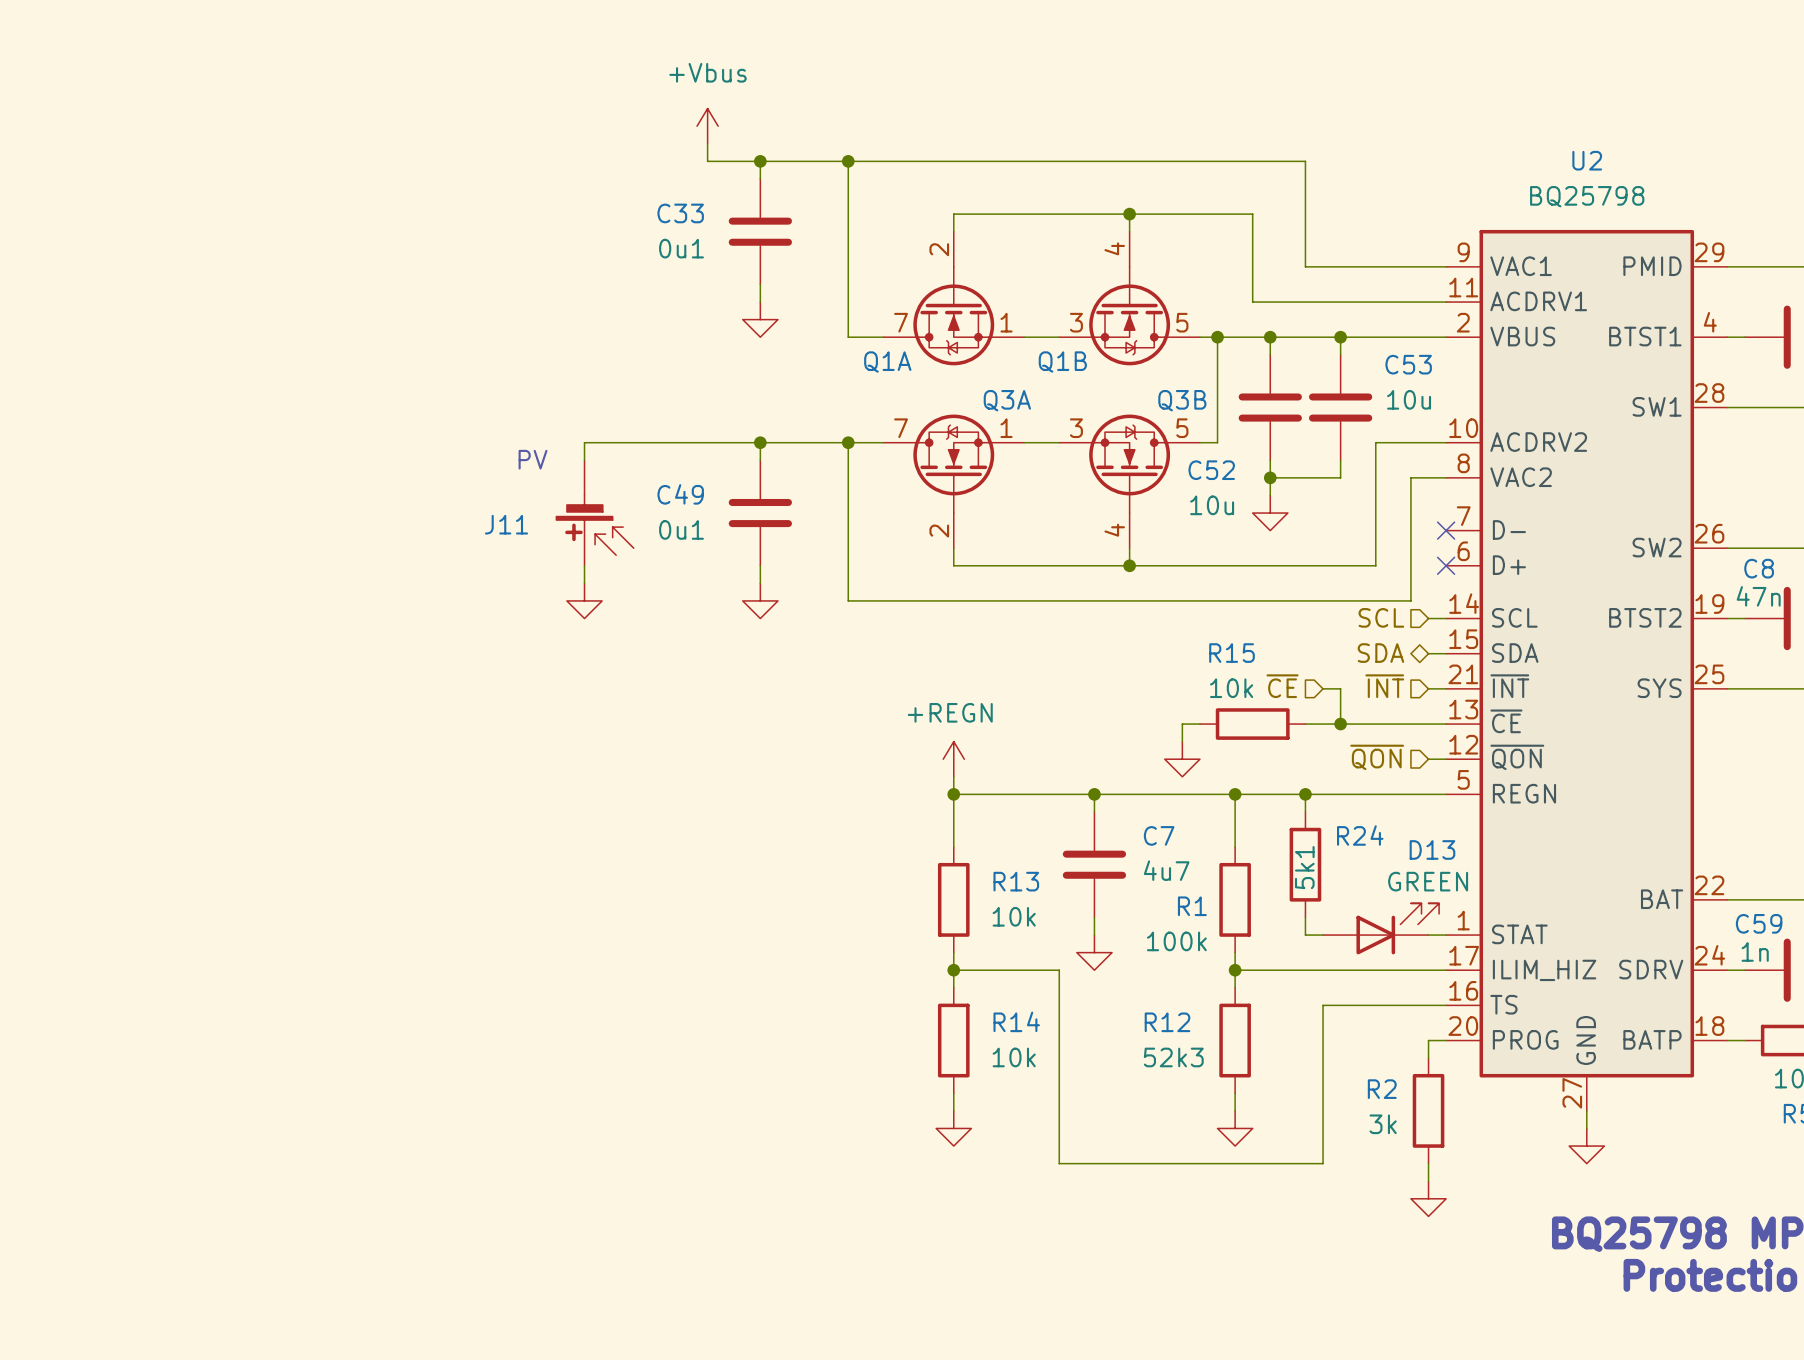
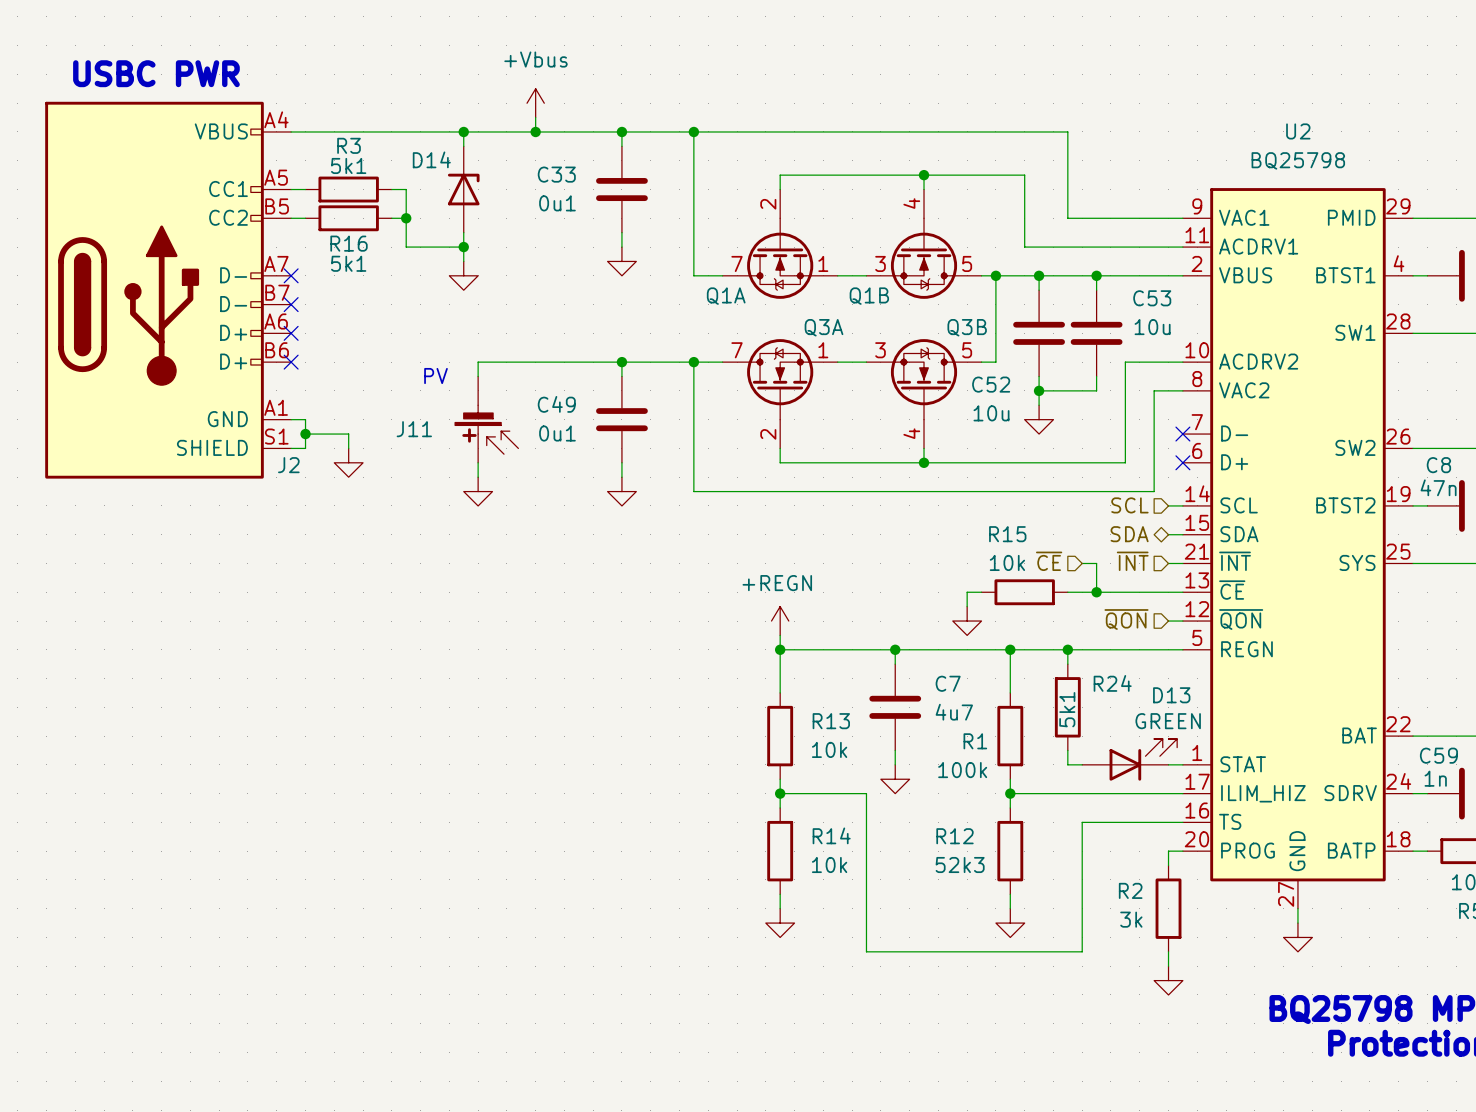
text: none -> USBC PWR (156, 73)
power symbol position: +Vbus (707, 126) -> +Vbus (535, 103)
wire: none -> (535, 117) (535, 131)
wire: (707, 143) (707, 161) -> (291, 131) (578, 131)
wire: none -> (463, 131) (463, 146)
junction: none -> (463, 131)
junction: none -> (535, 131)
wire: none -> (291, 189) (305, 189)
R3: none -> 5k1 (348, 189)
wire: none -> (391, 189) (406, 189) (406, 247) (463, 247)
D14: none -> (463, 189)
wire: none -> (291, 218) (305, 218)
R16: none -> 5k1 (348, 218)
wire: none -> (391, 218) (406, 218)
junction: none -> (406, 218)
wire: none -> (463, 232) (463, 261)
junction: none -> (463, 247)
no-connect mark: none -> (291, 275)
power symbol: none -> (463, 275)
J2: none -> (168, 290)
no-connect mark: none -> (291, 304)
no-connect mark: none -> (291, 333)
no-connect mark: none -> (291, 362)
wire: none -> (291, 419) (305, 419) (305, 448) (291, 448)
wire: none -> (305, 434) (348, 434) (348, 448)
junction: none -> (305, 434)
power symbol: none -> (348, 462)

